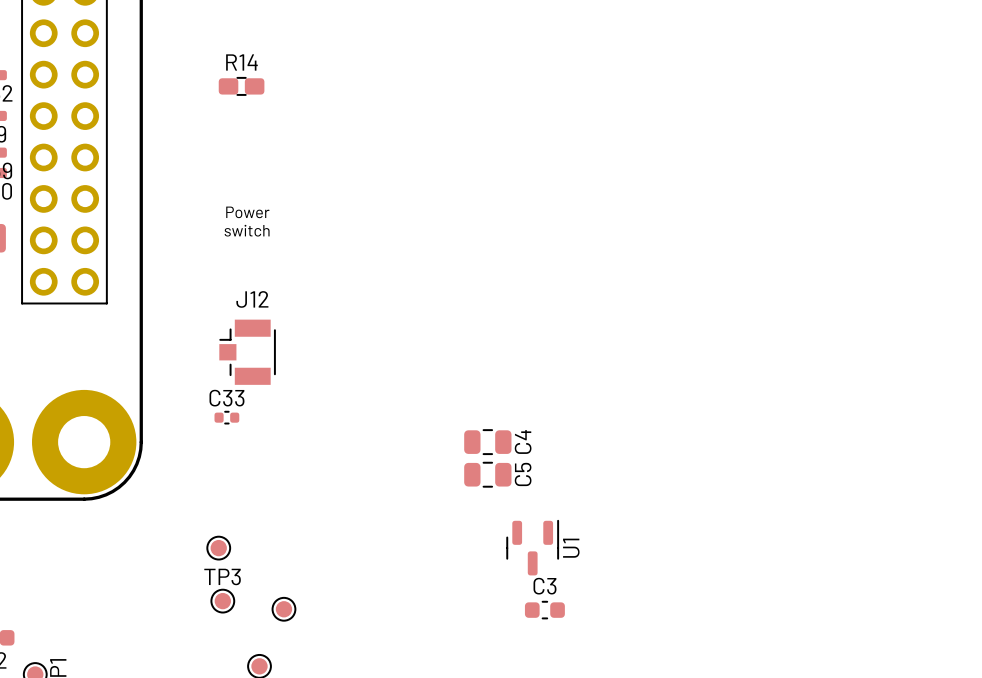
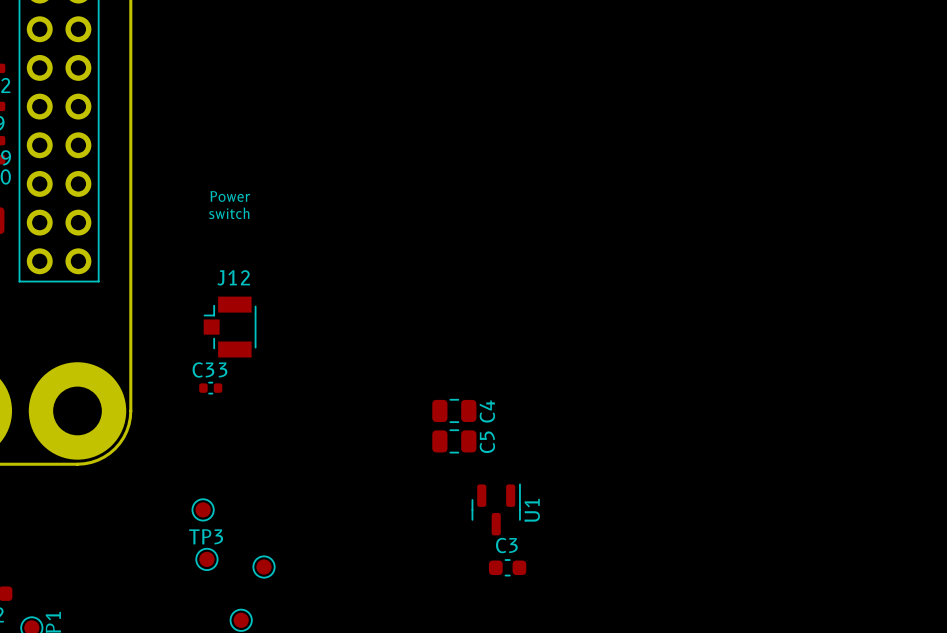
R14: (241, 86) -> none

